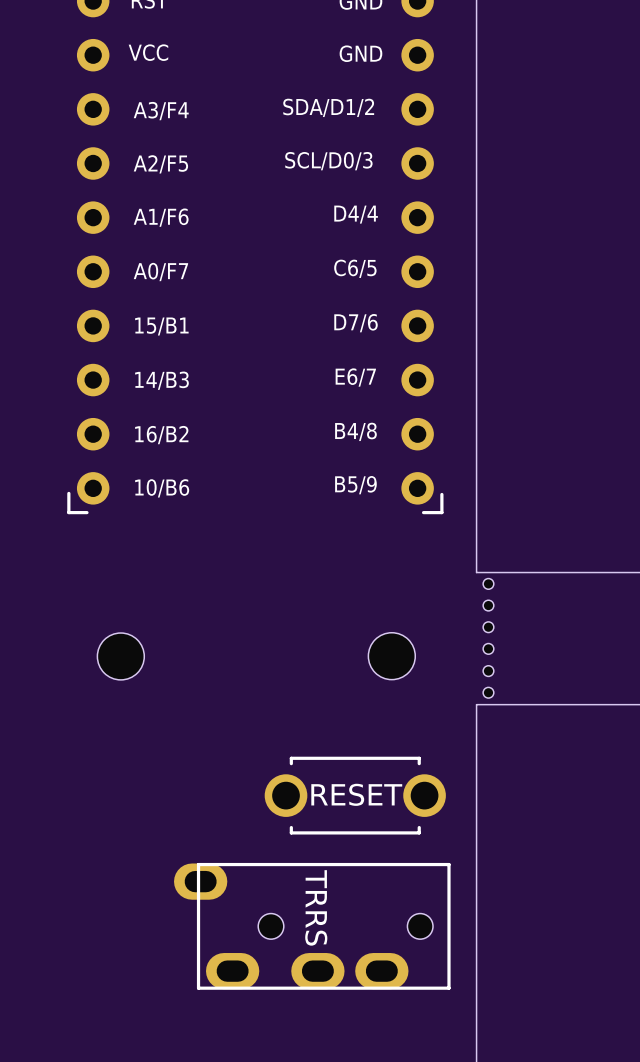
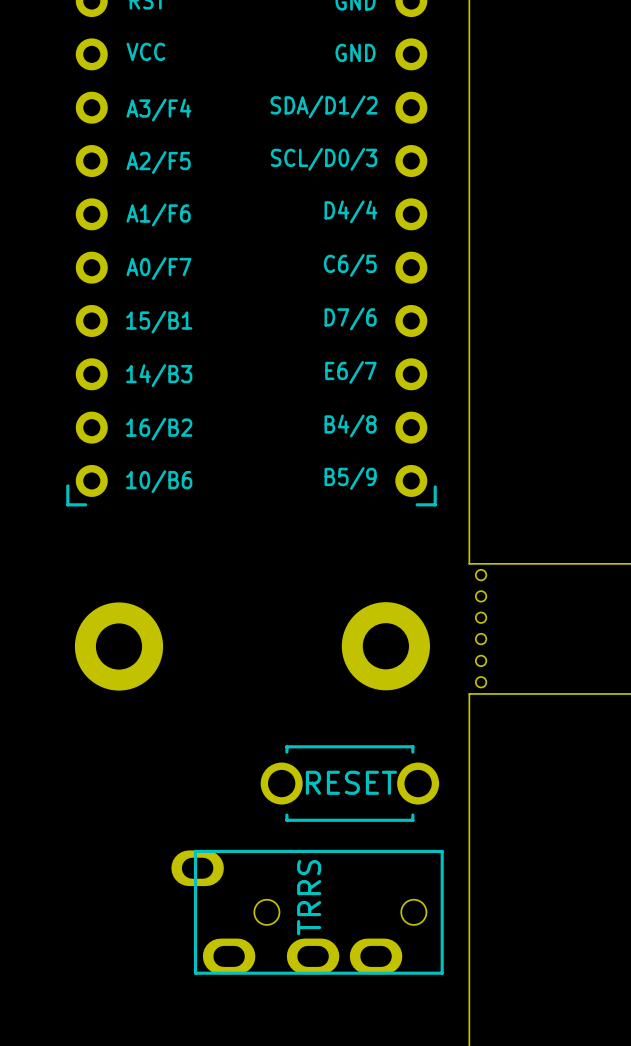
part footprint: [368, 632, 416, 680] -> [341, 602, 430, 691]
part footprint: [97, 633, 145, 680] -> [74, 602, 164, 691]
part text rotation: 0° (316, 907) -> 180° (309, 897)

